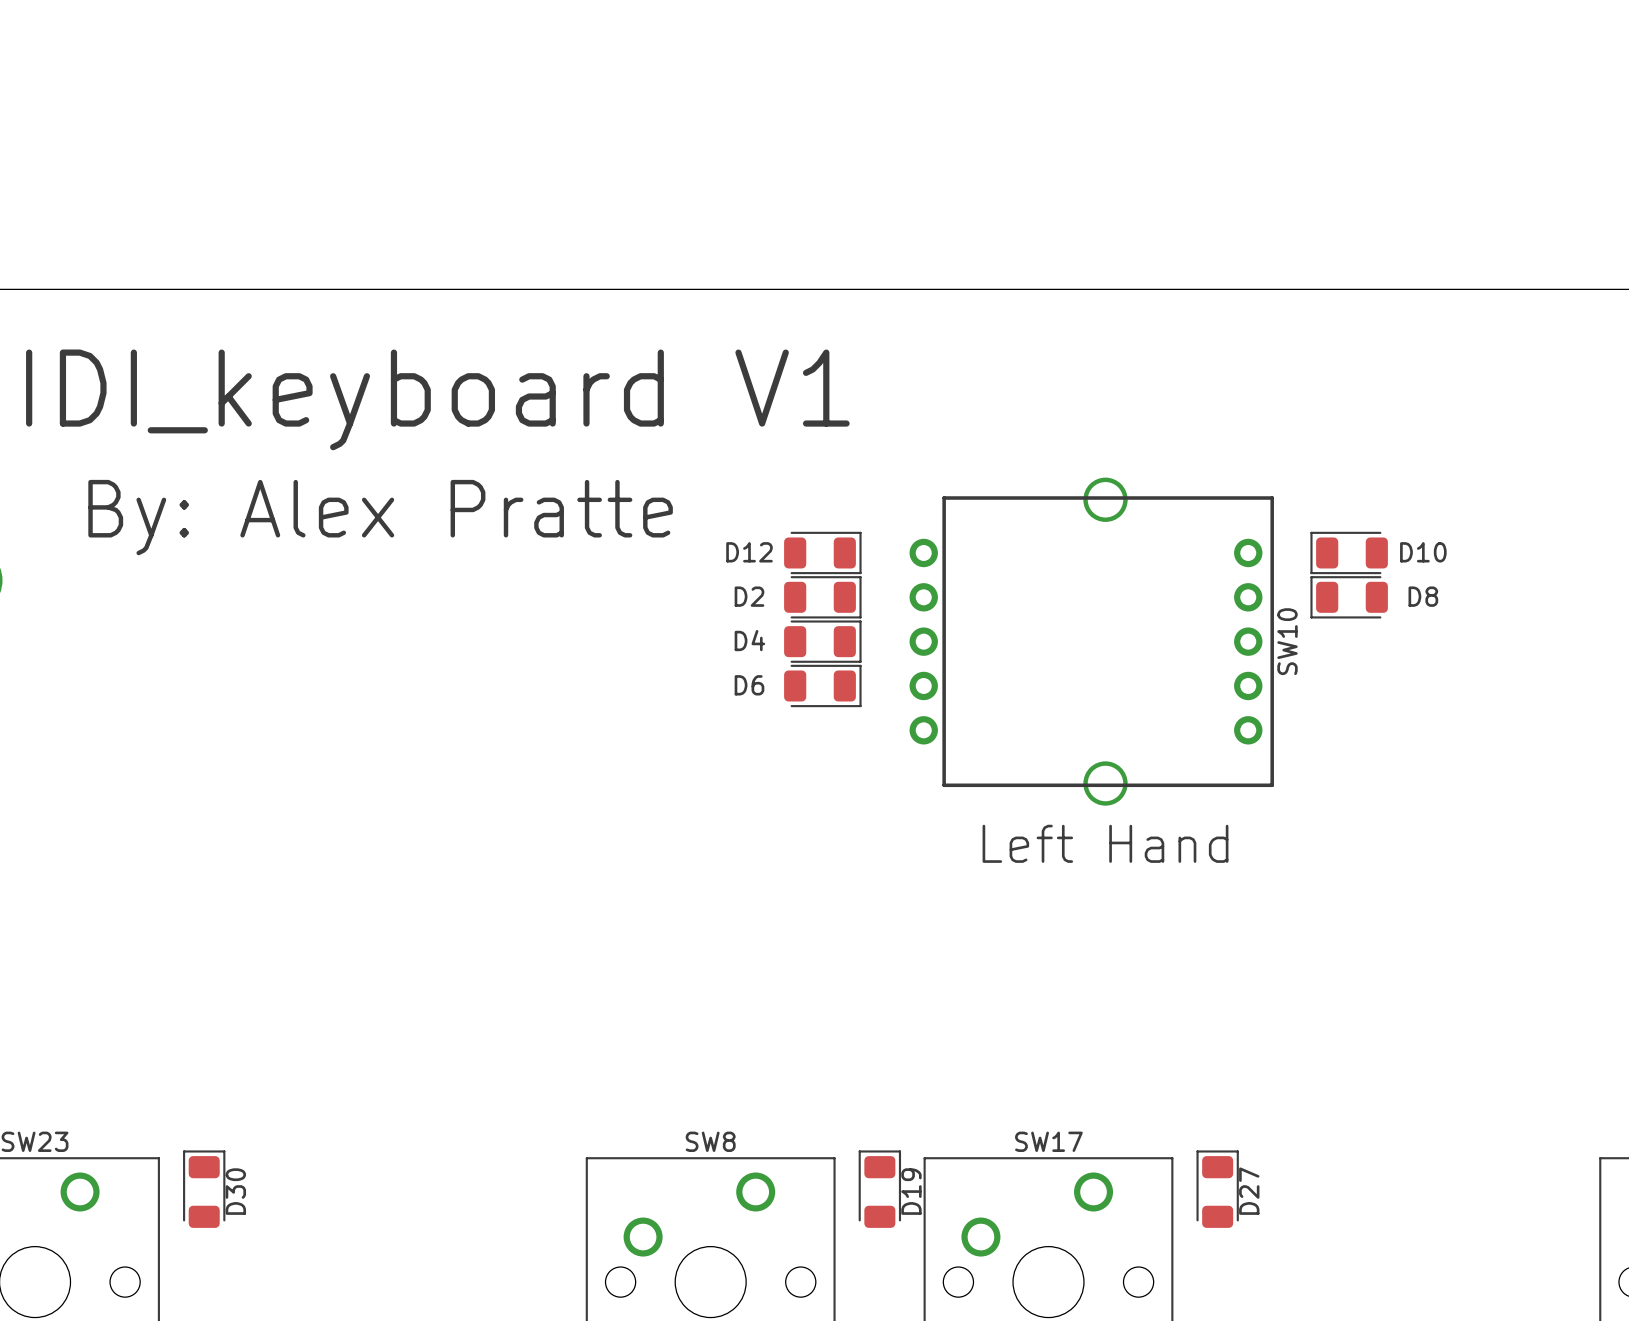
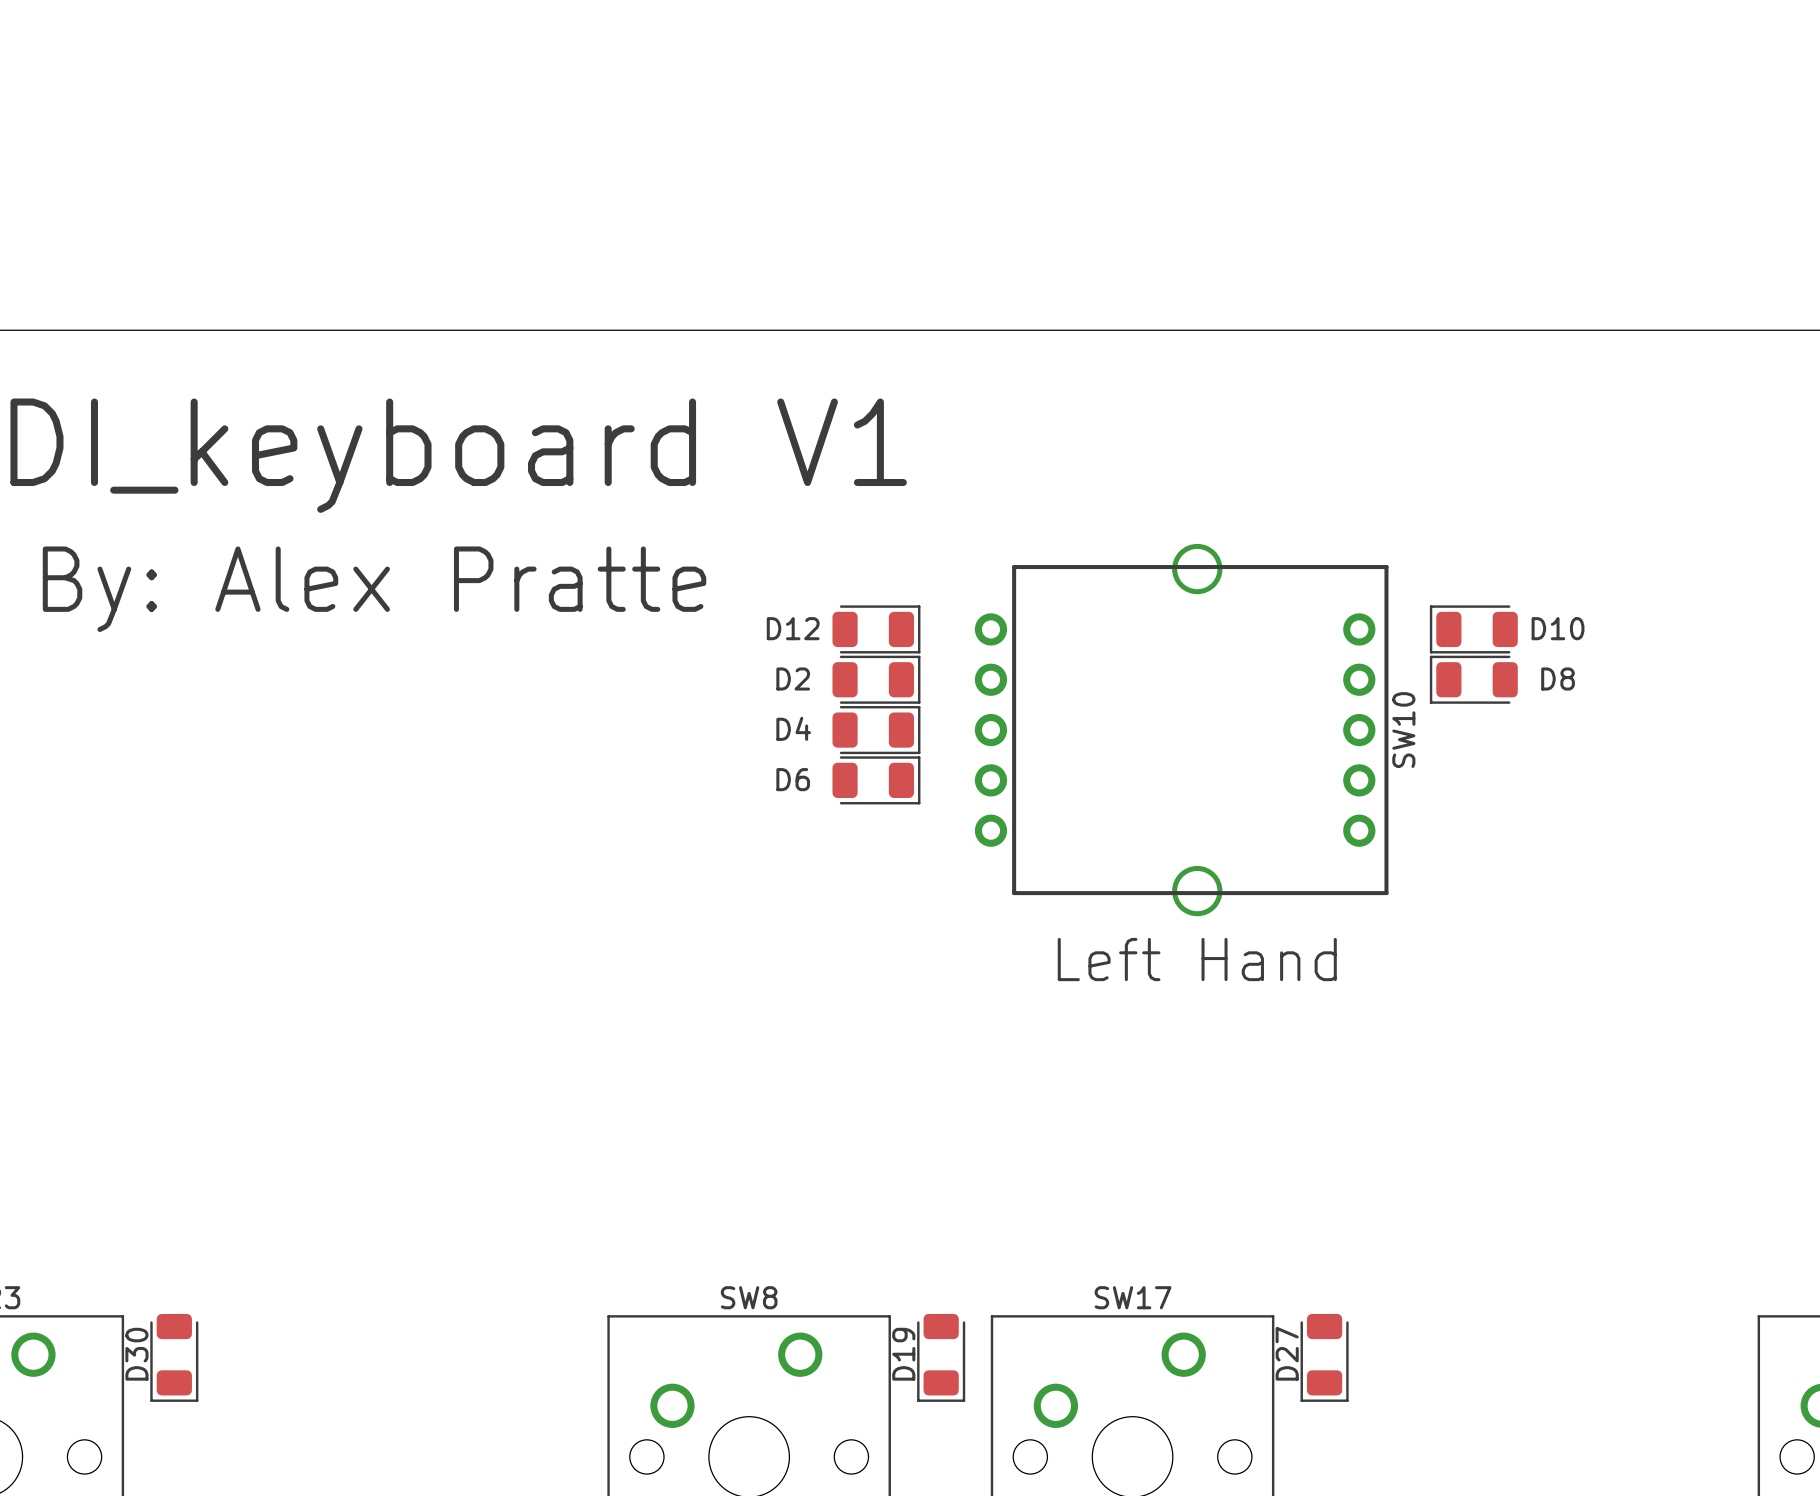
D30 rotation: 0° (204, 1189) -> 180° (174, 1357)
D19 rotation: 0° (879, 1189) -> 180° (941, 1357)
D27 rotation: 0° (1217, 1189) -> 180° (1324, 1357)

